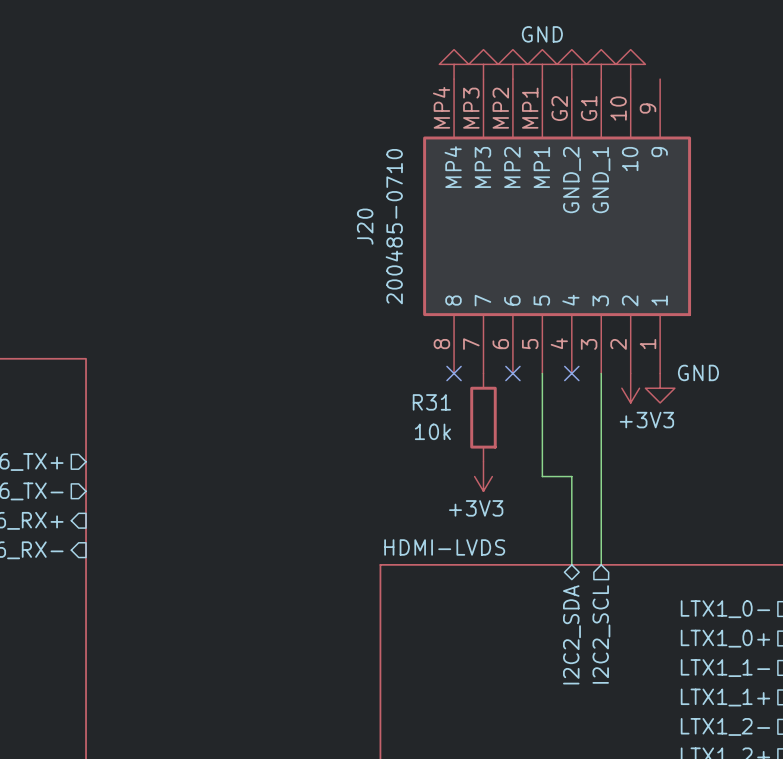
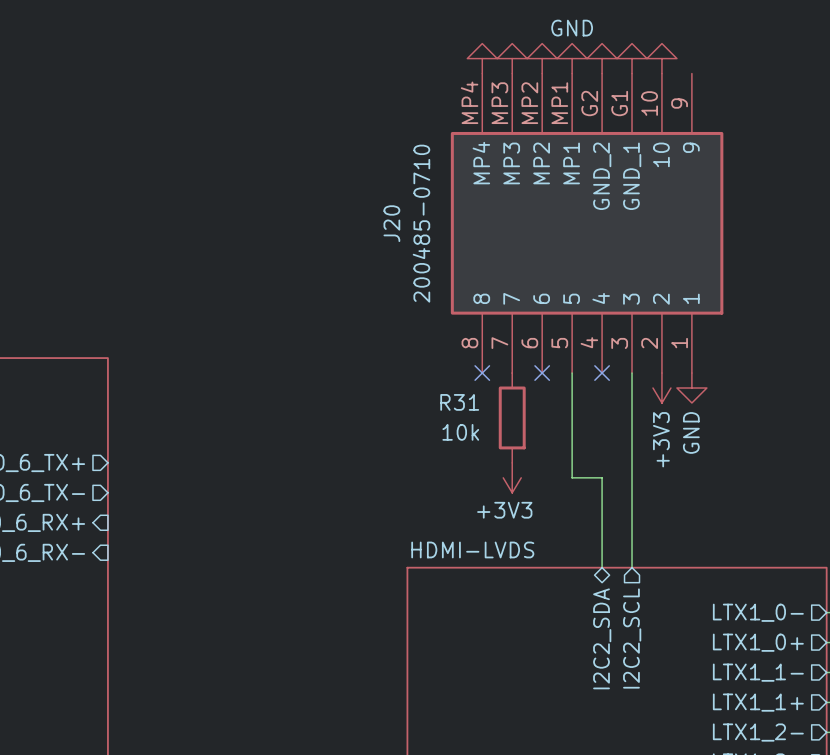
power symbol text rotation: 0° (698, 372) -> 90° counterclockwise (691, 432)
power symbol text position: GND (698, 372) -> GND (691, 432)
power symbol text rotation: 0° (646, 420) -> 90° counterclockwise (661, 439)

